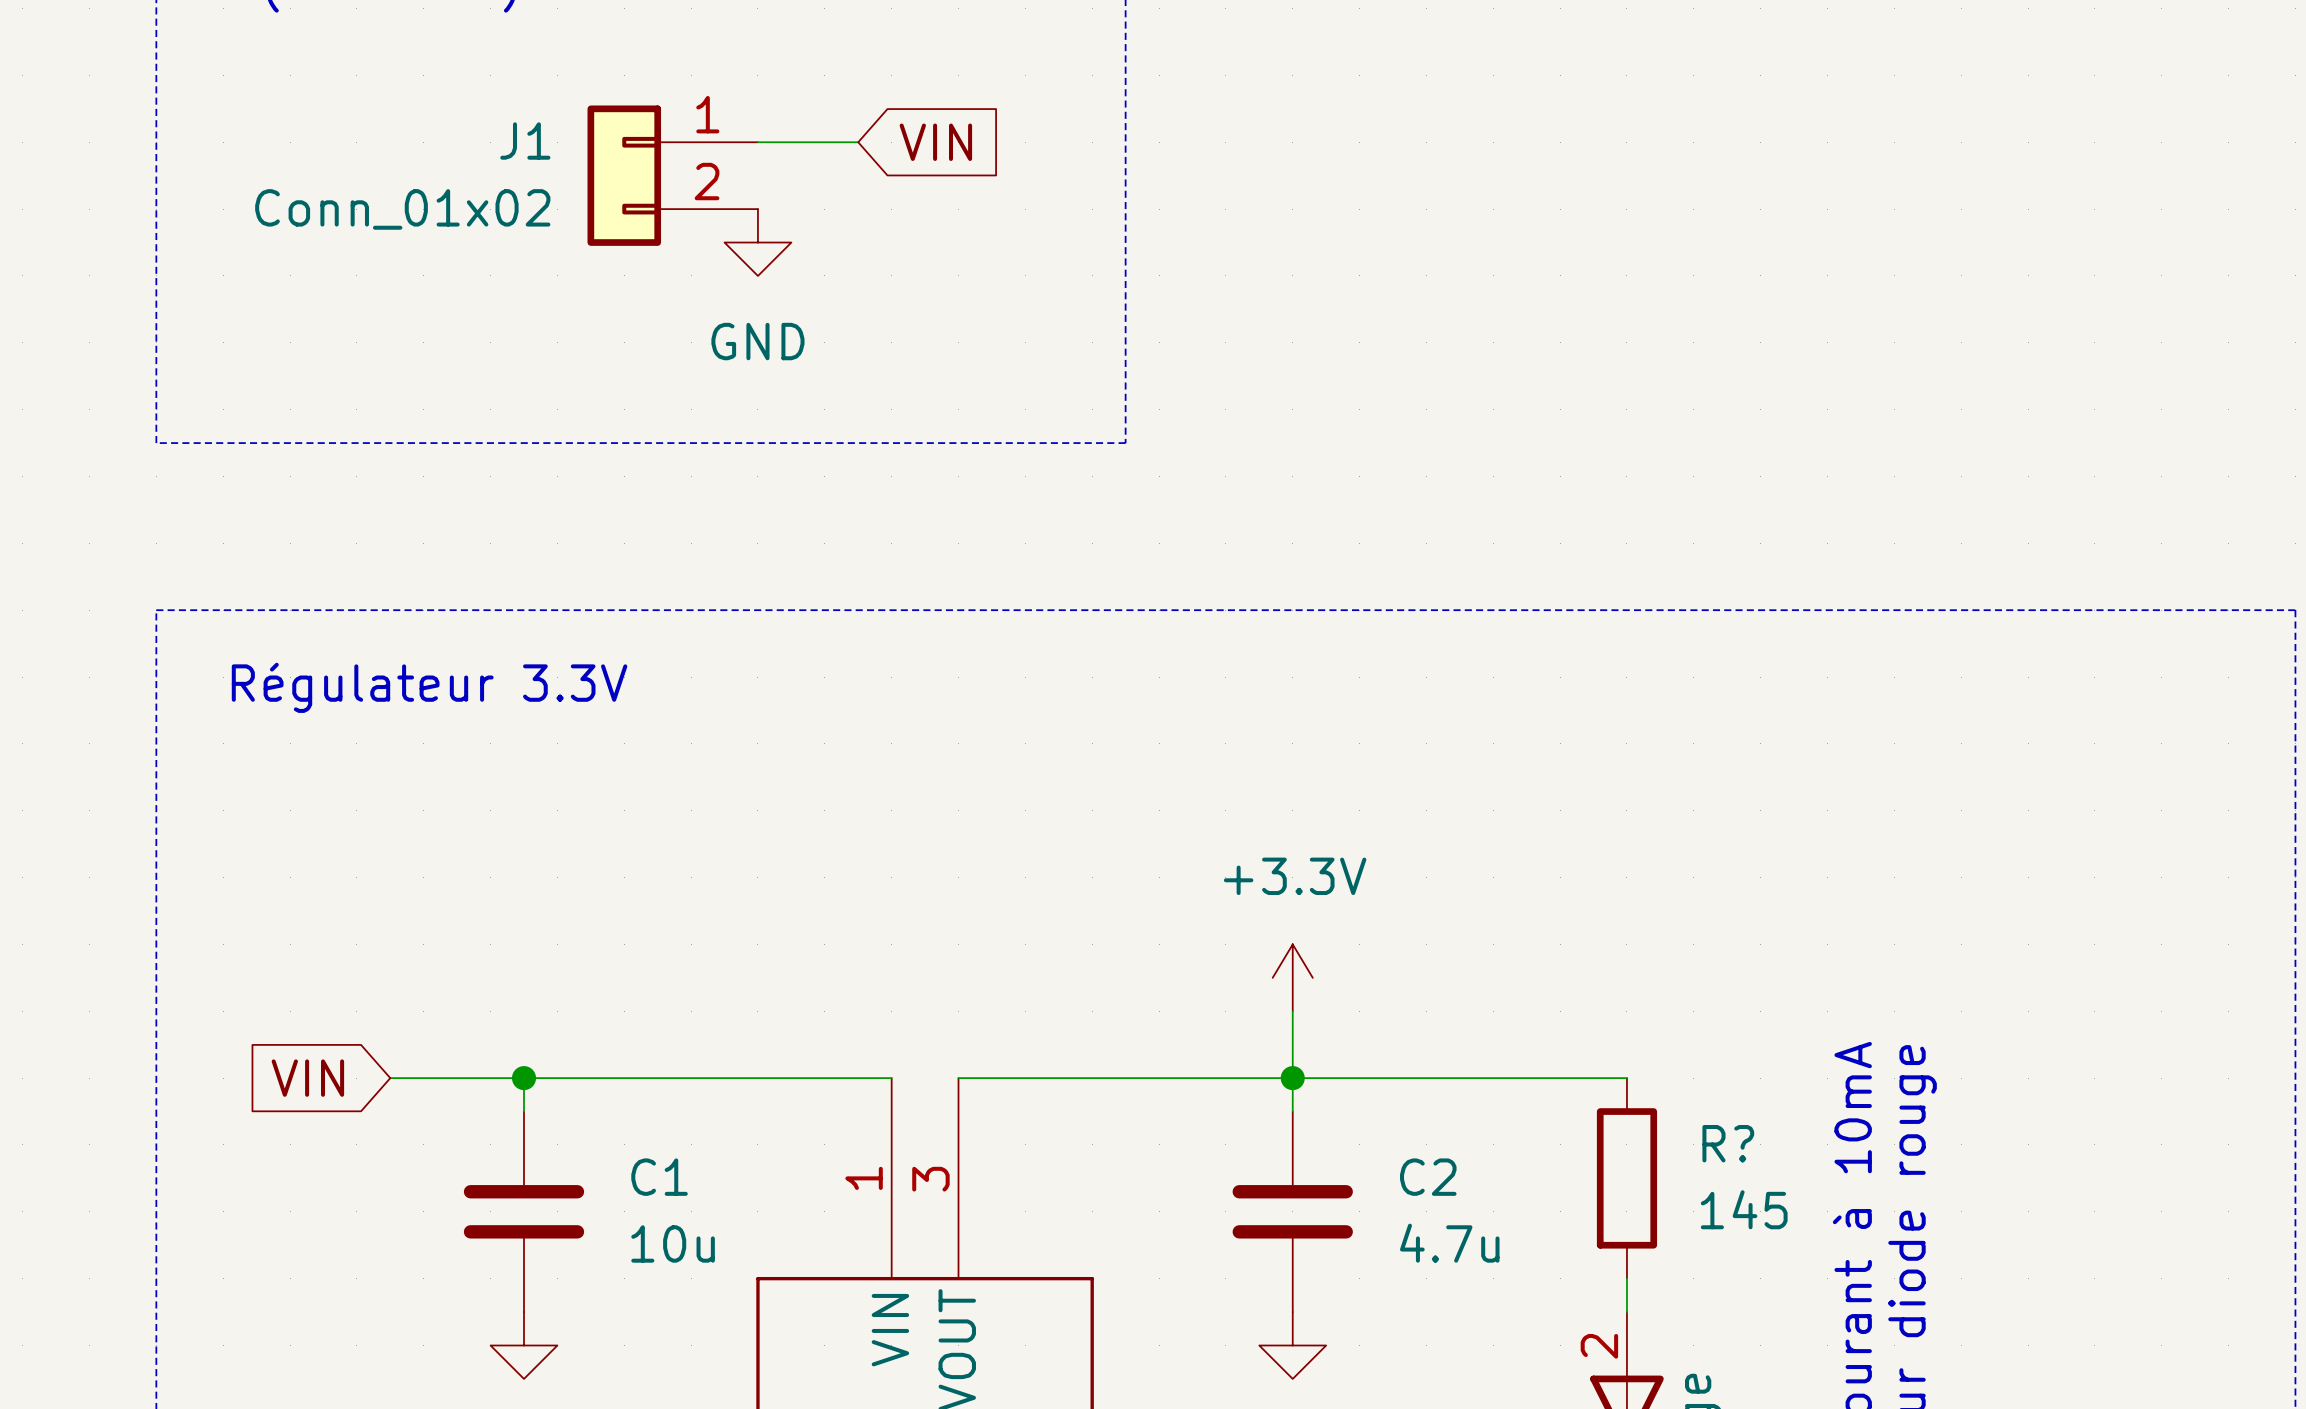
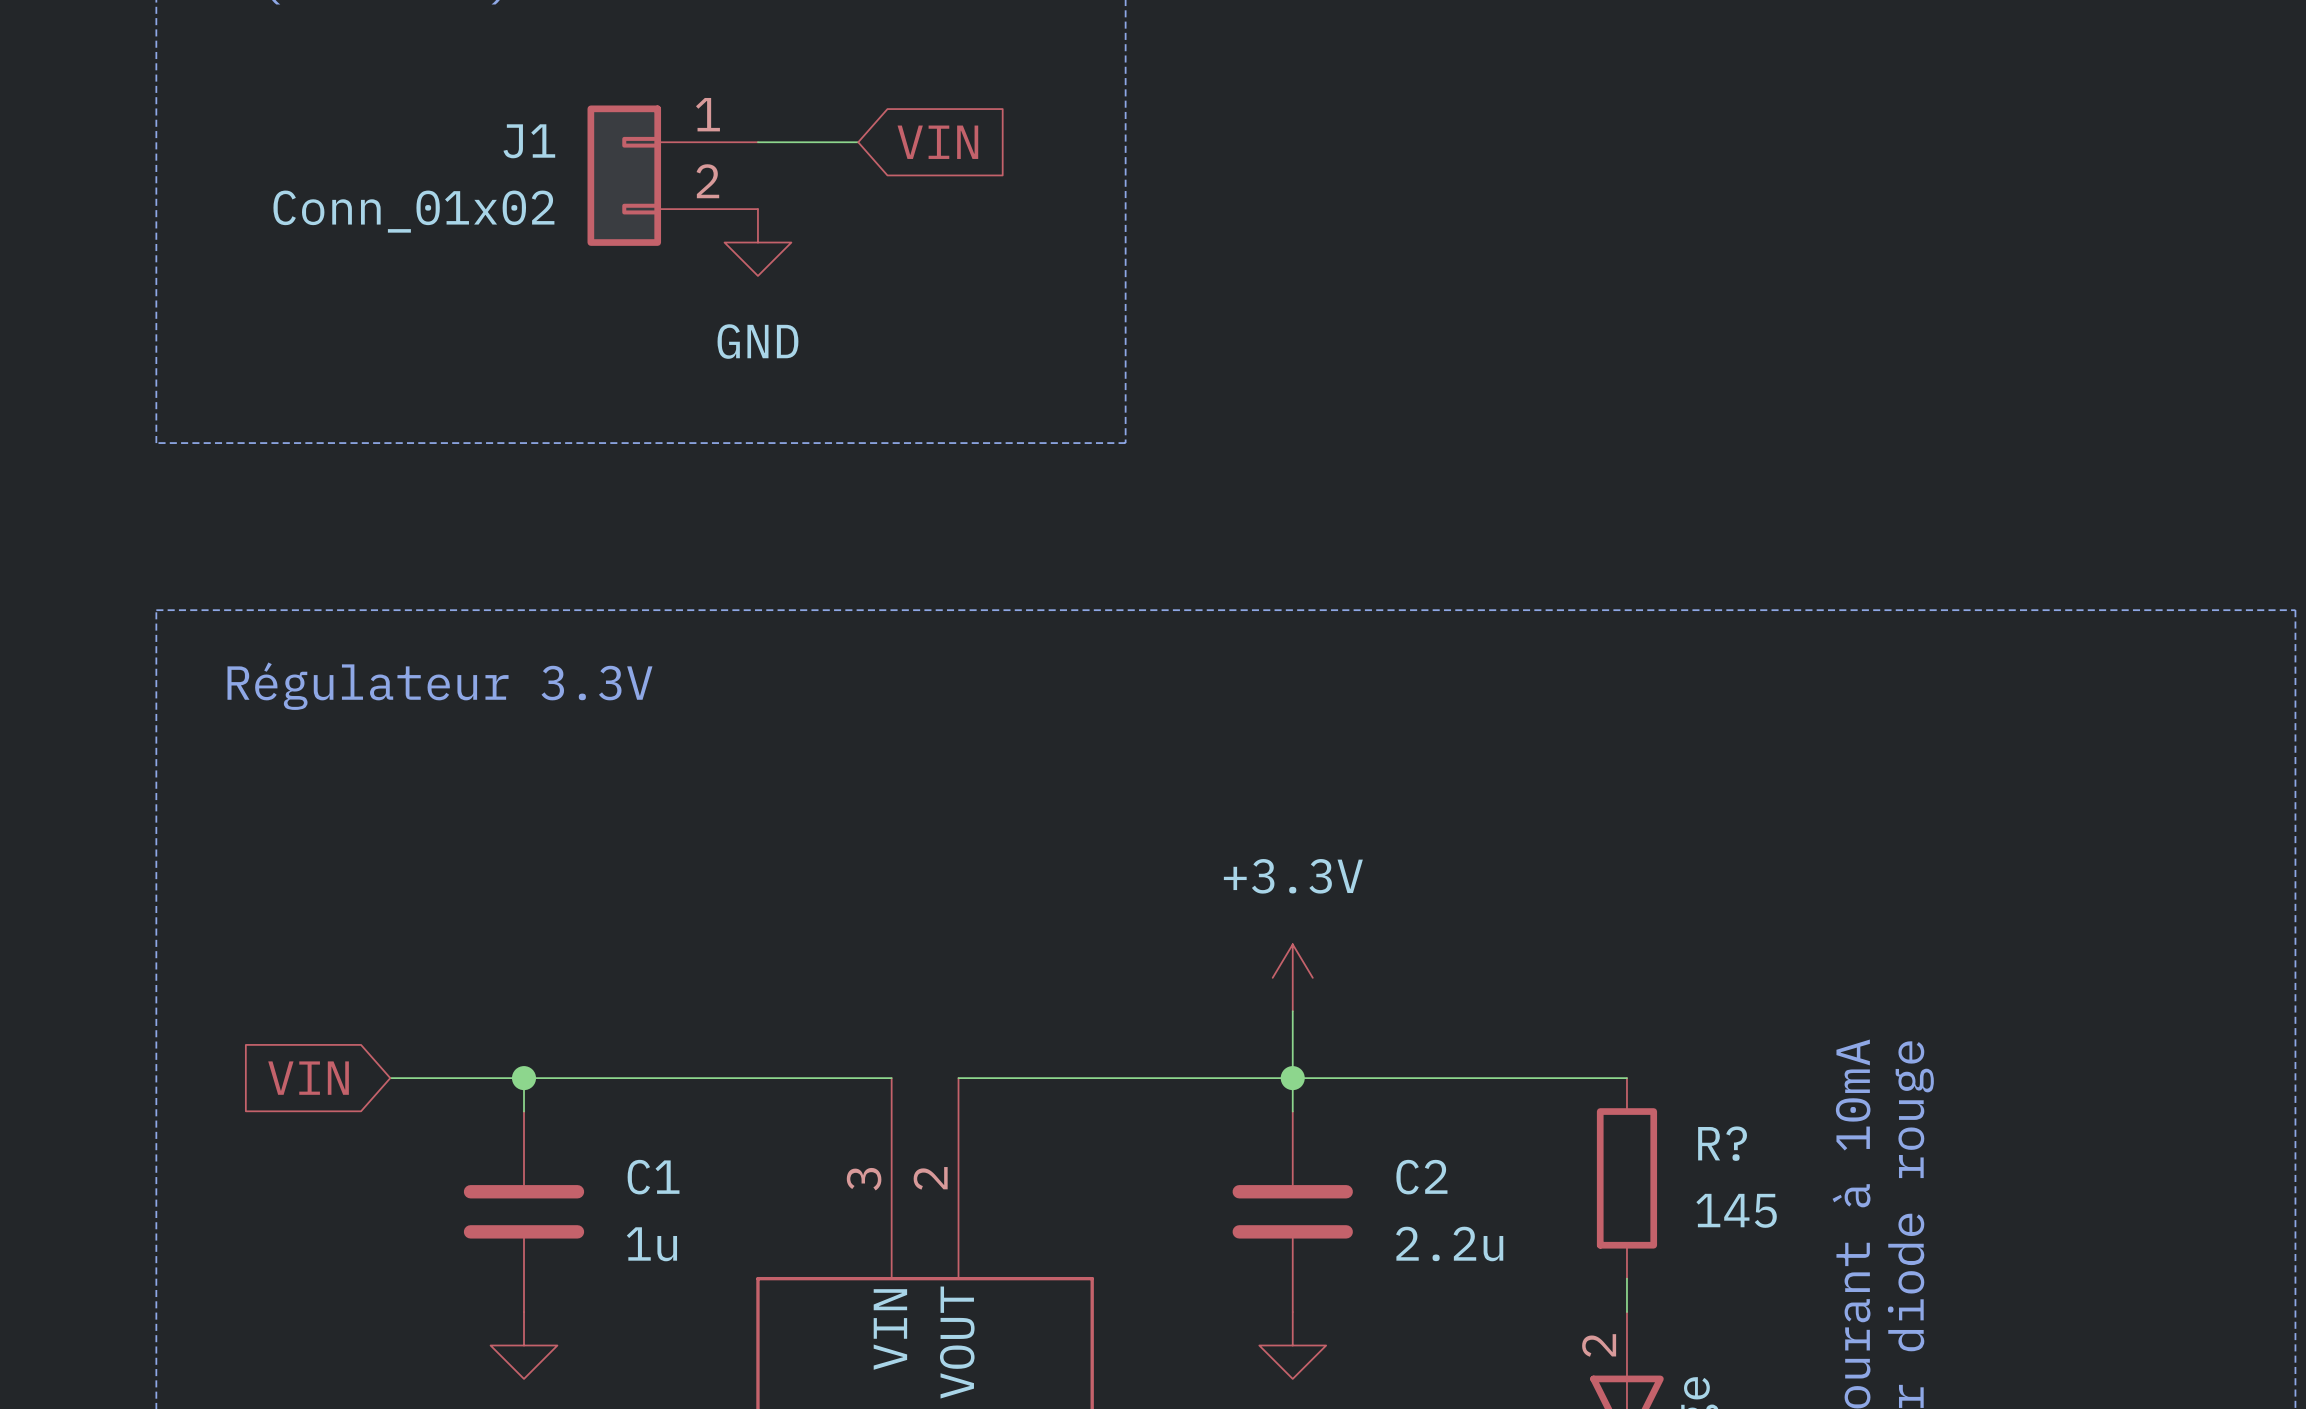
part pin number: 1 (864, 1178) -> 3 (864, 1179)
part pin number: 3 (930, 1179) -> 2 (930, 1178)
C1 value: 10u (673, 1243) -> 1u (651, 1244)
C2 value: 4.7u (1449, 1243) -> 2.2u (1449, 1243)

